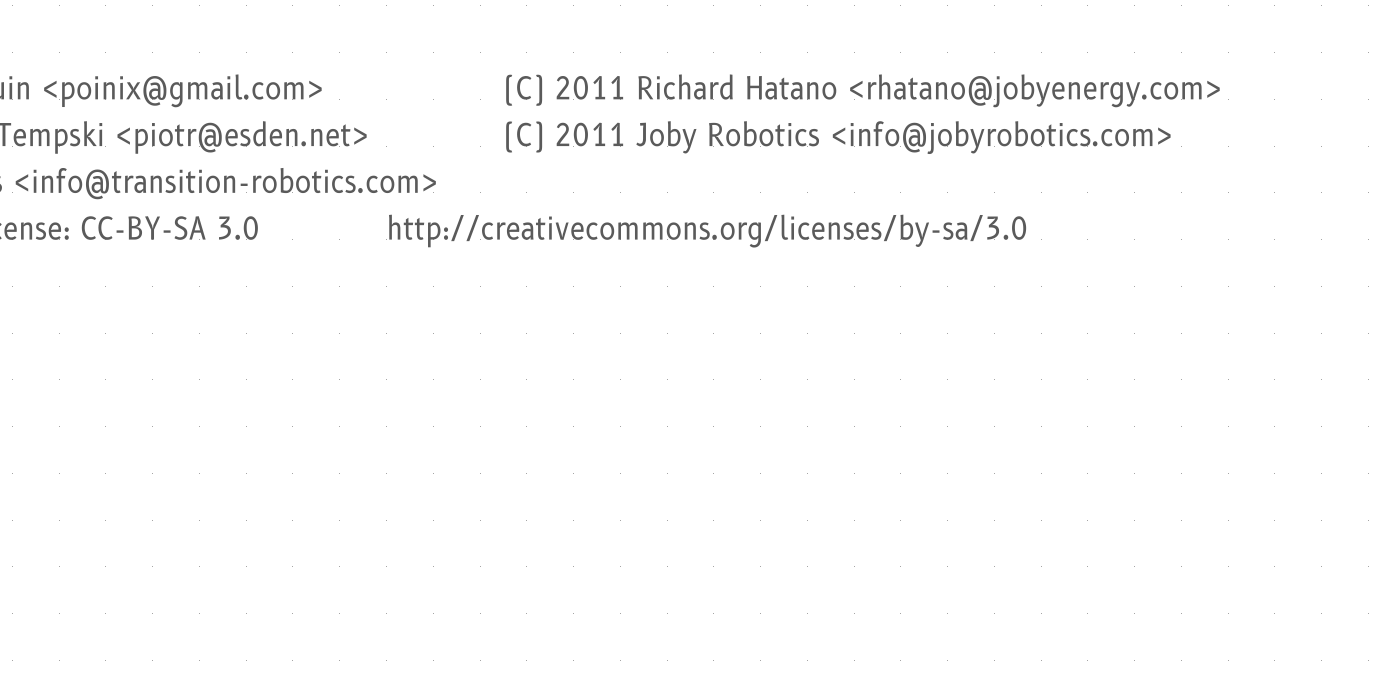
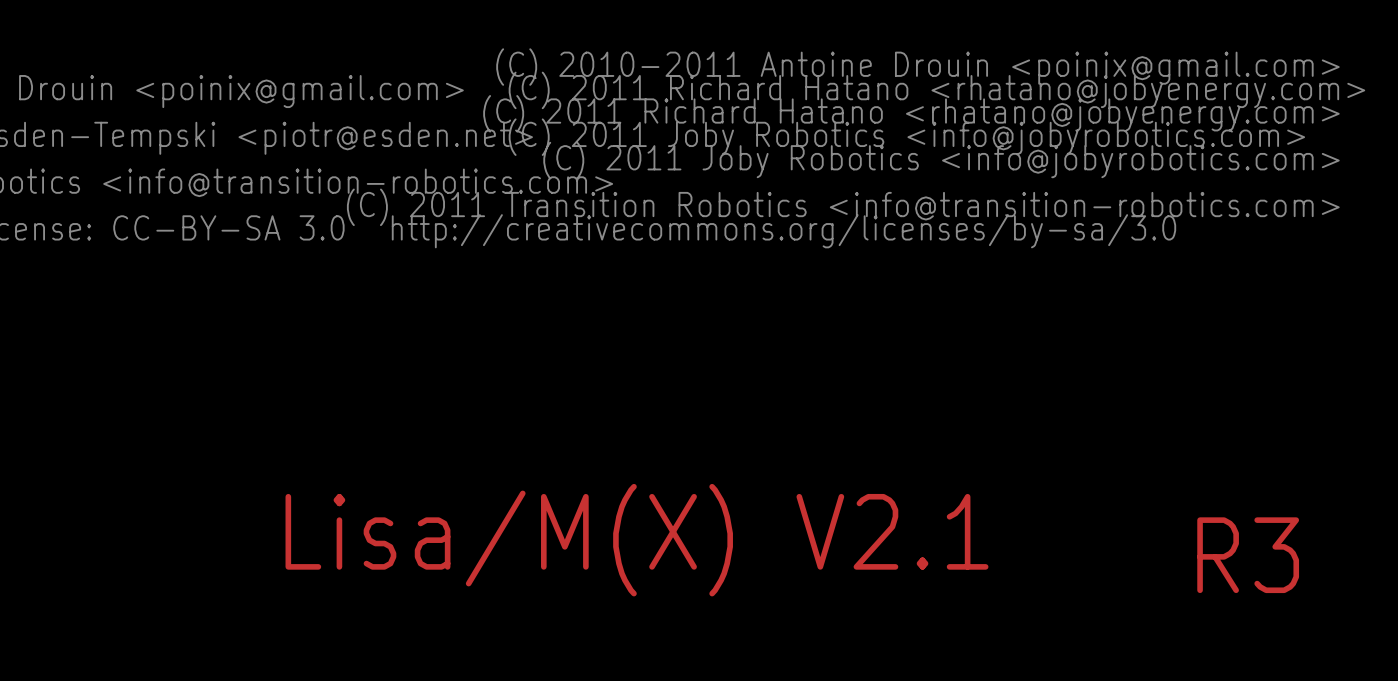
text: none -> (C) 2010-2011 Antoine Drouin <poinix@gmail.com> (917, 67)
text: none -> (C) 2011 Richard Hatano <rhatano@jobyenergy.com> (911, 113)
text: none -> (C) 2011 Joby Robotics <info@jobyrobotics.com> (941, 160)
text: none -> (C) 2011 Transition Robotics <info@transition-robotics.com> (843, 207)
text: none -> Lisa/M(X) V2.1 (636, 540)
text: none -> R3 (1248, 555)

